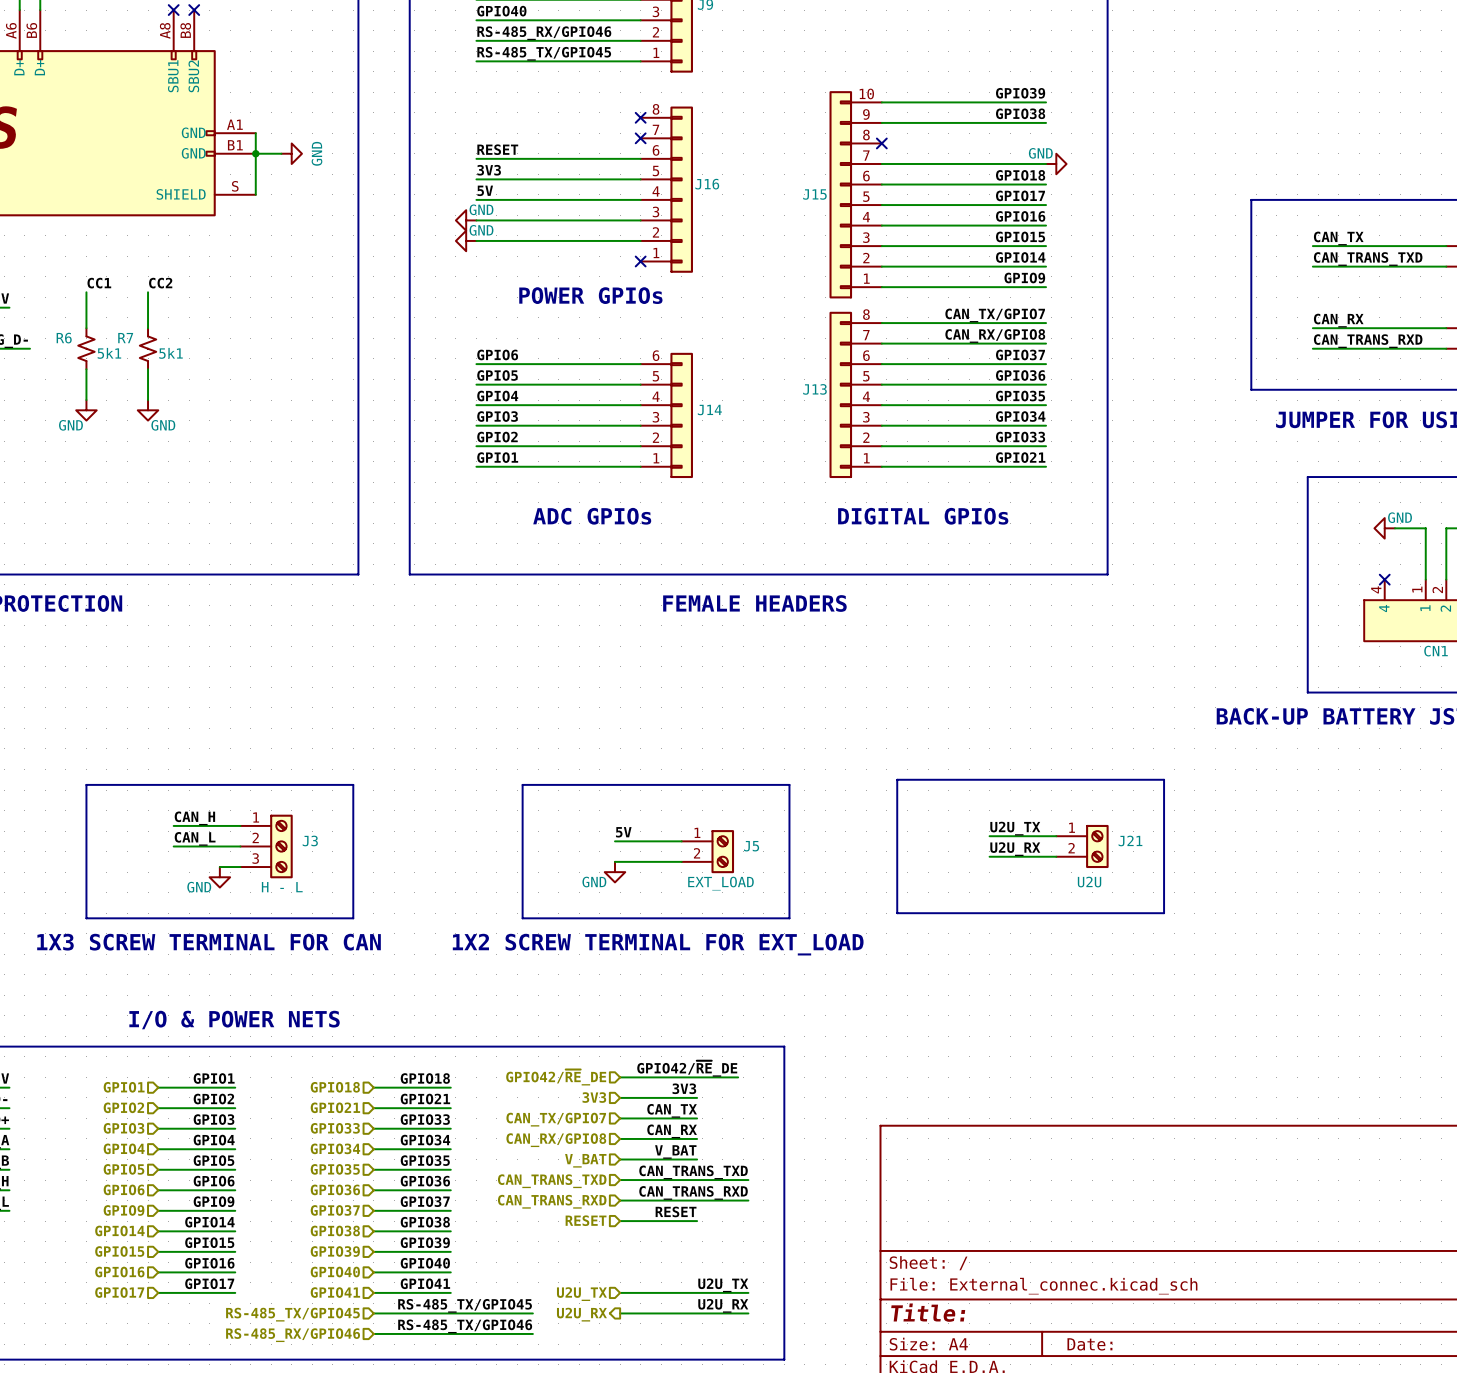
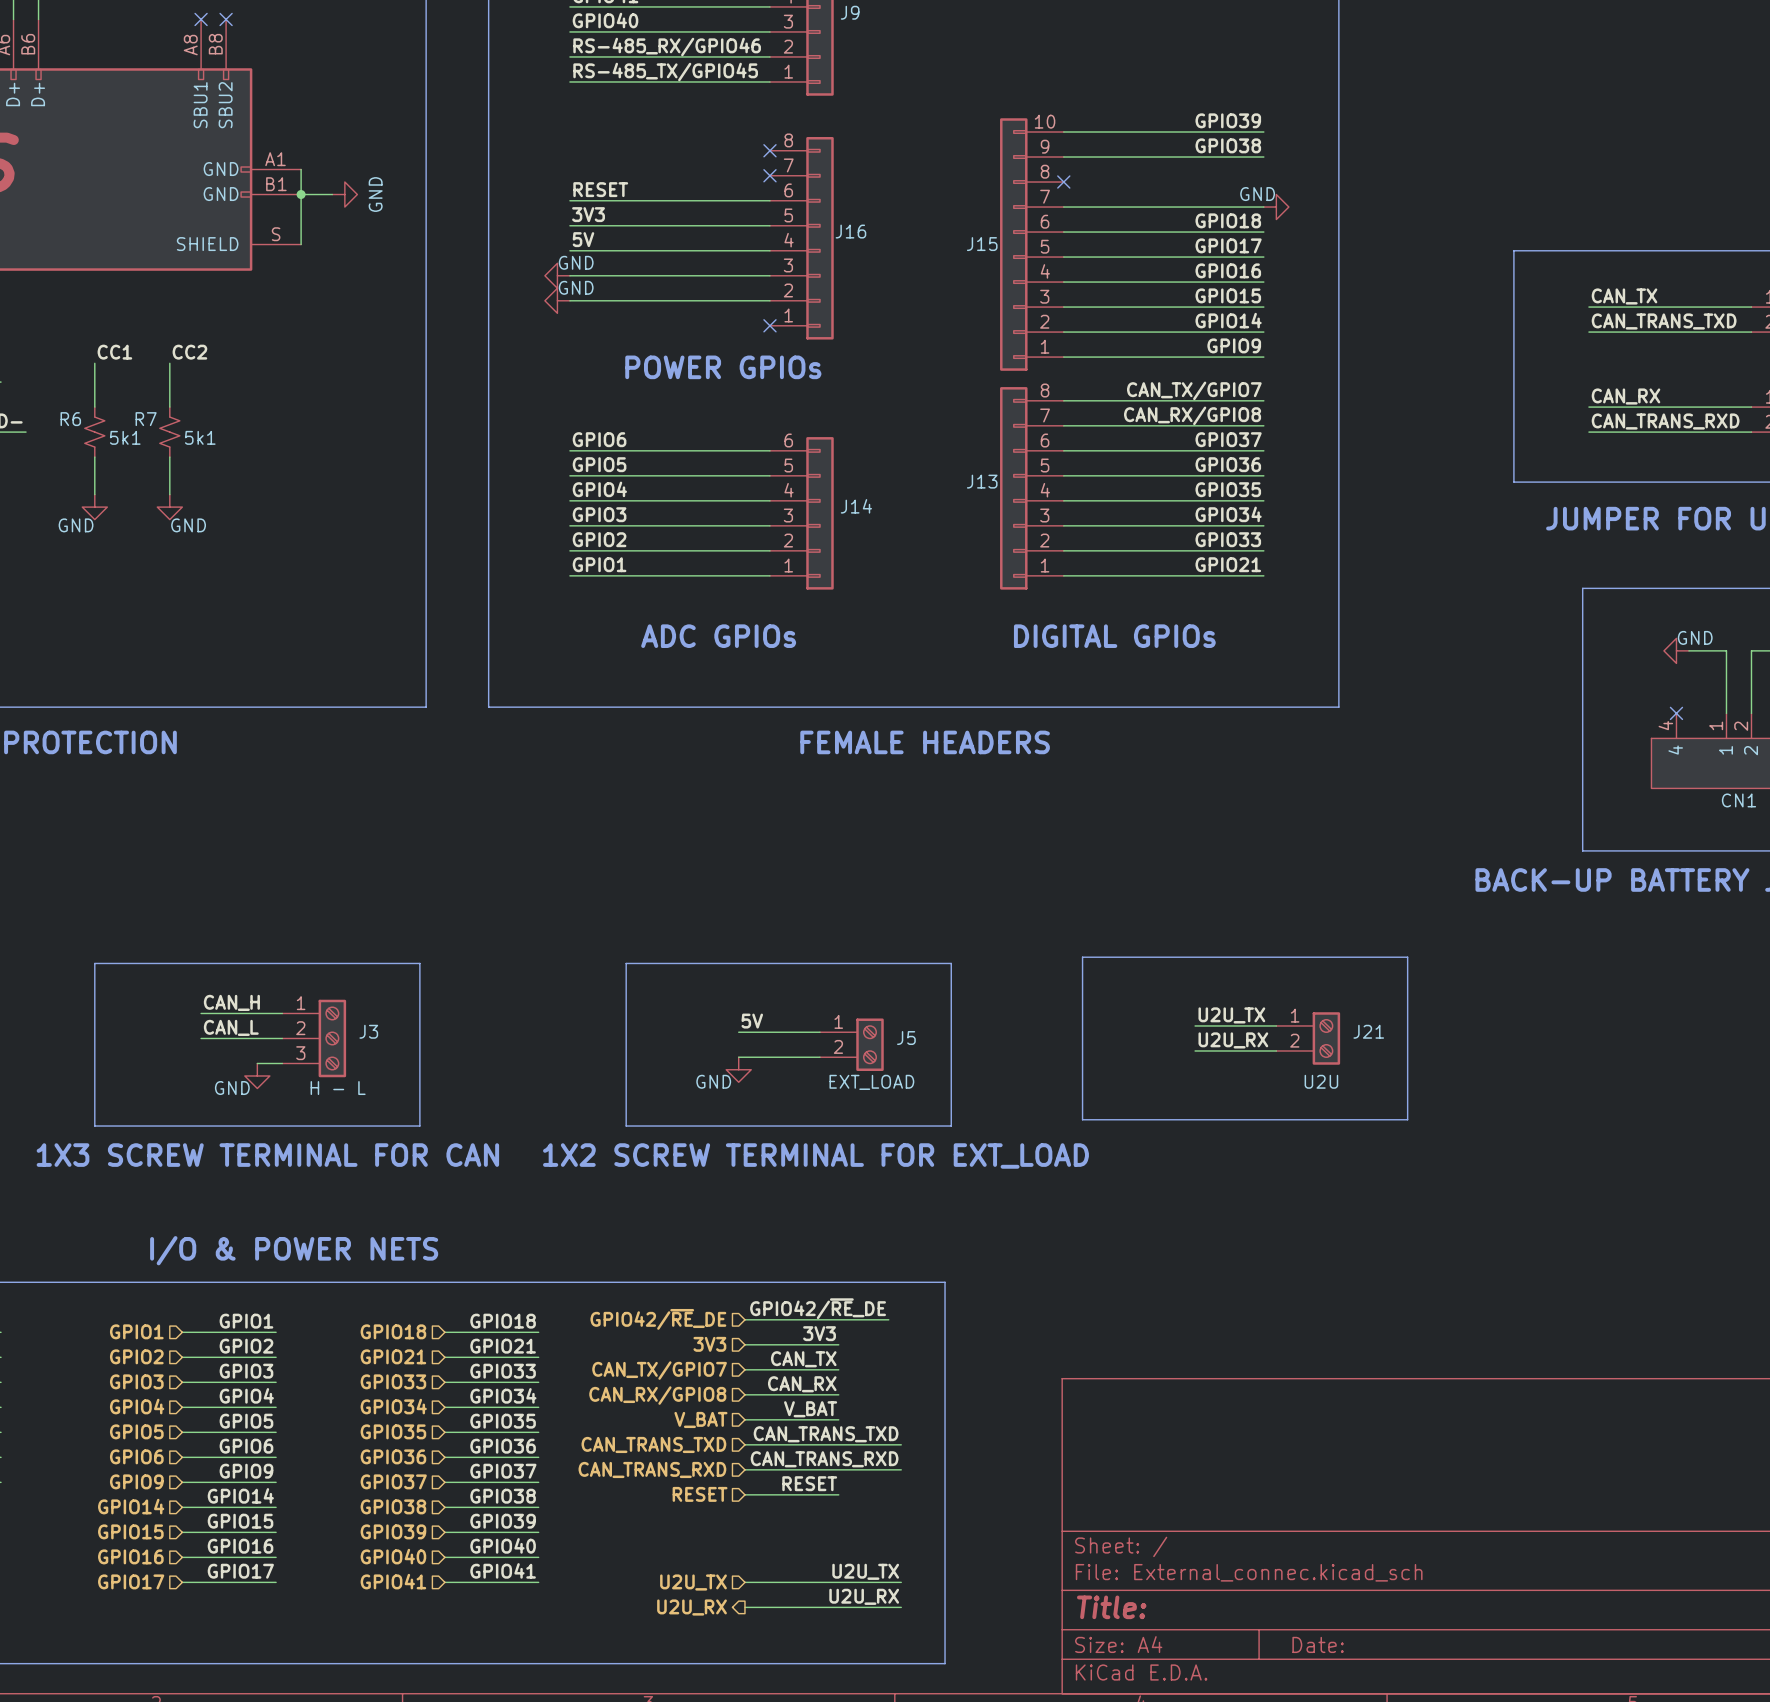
label: RS-485_TX/GPIO45 (465, 1305) -> none
wire: (373, 1313) (532, 1313) -> none
hierarchical label: RS-485_TX/GPIO45 (292, 1314) -> none
label: RS-485_TX/GPIO46 (465, 1326) -> none
wire: (373, 1333) (532, 1333) -> none
hierarchical label: RS-485_RX/GPIO46 (293, 1335) -> none

